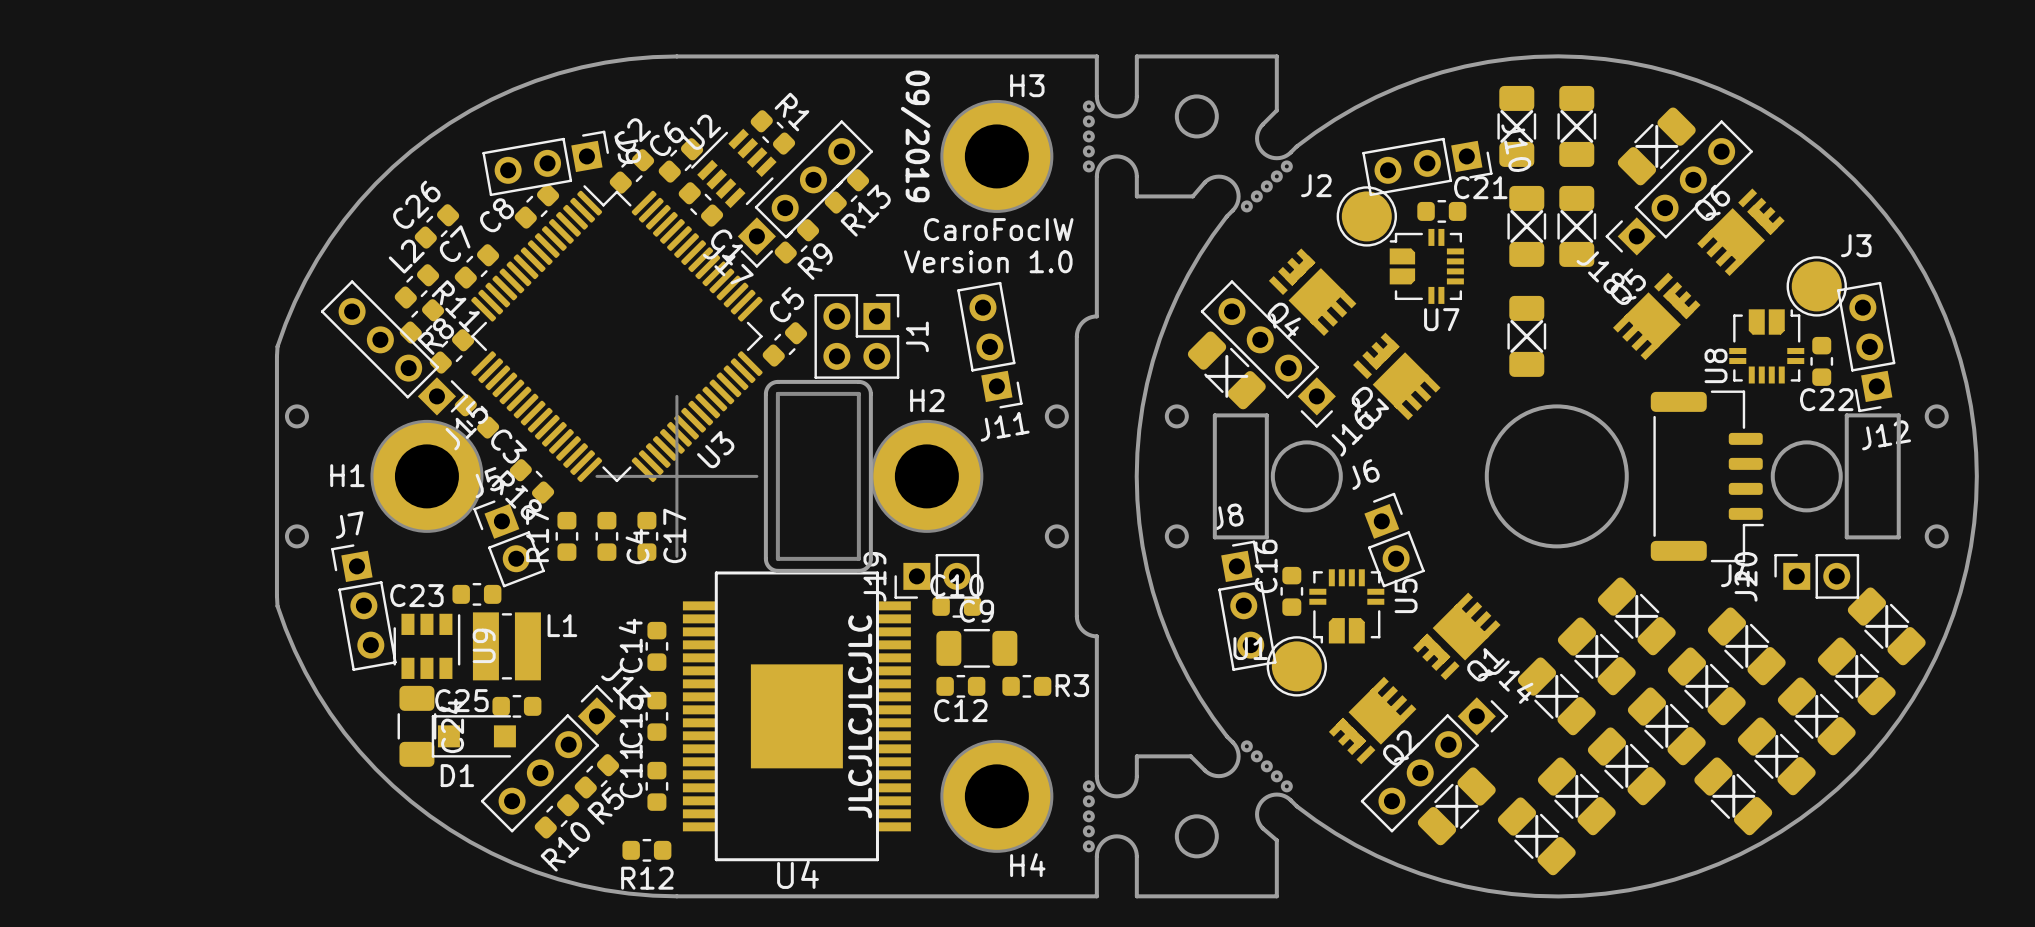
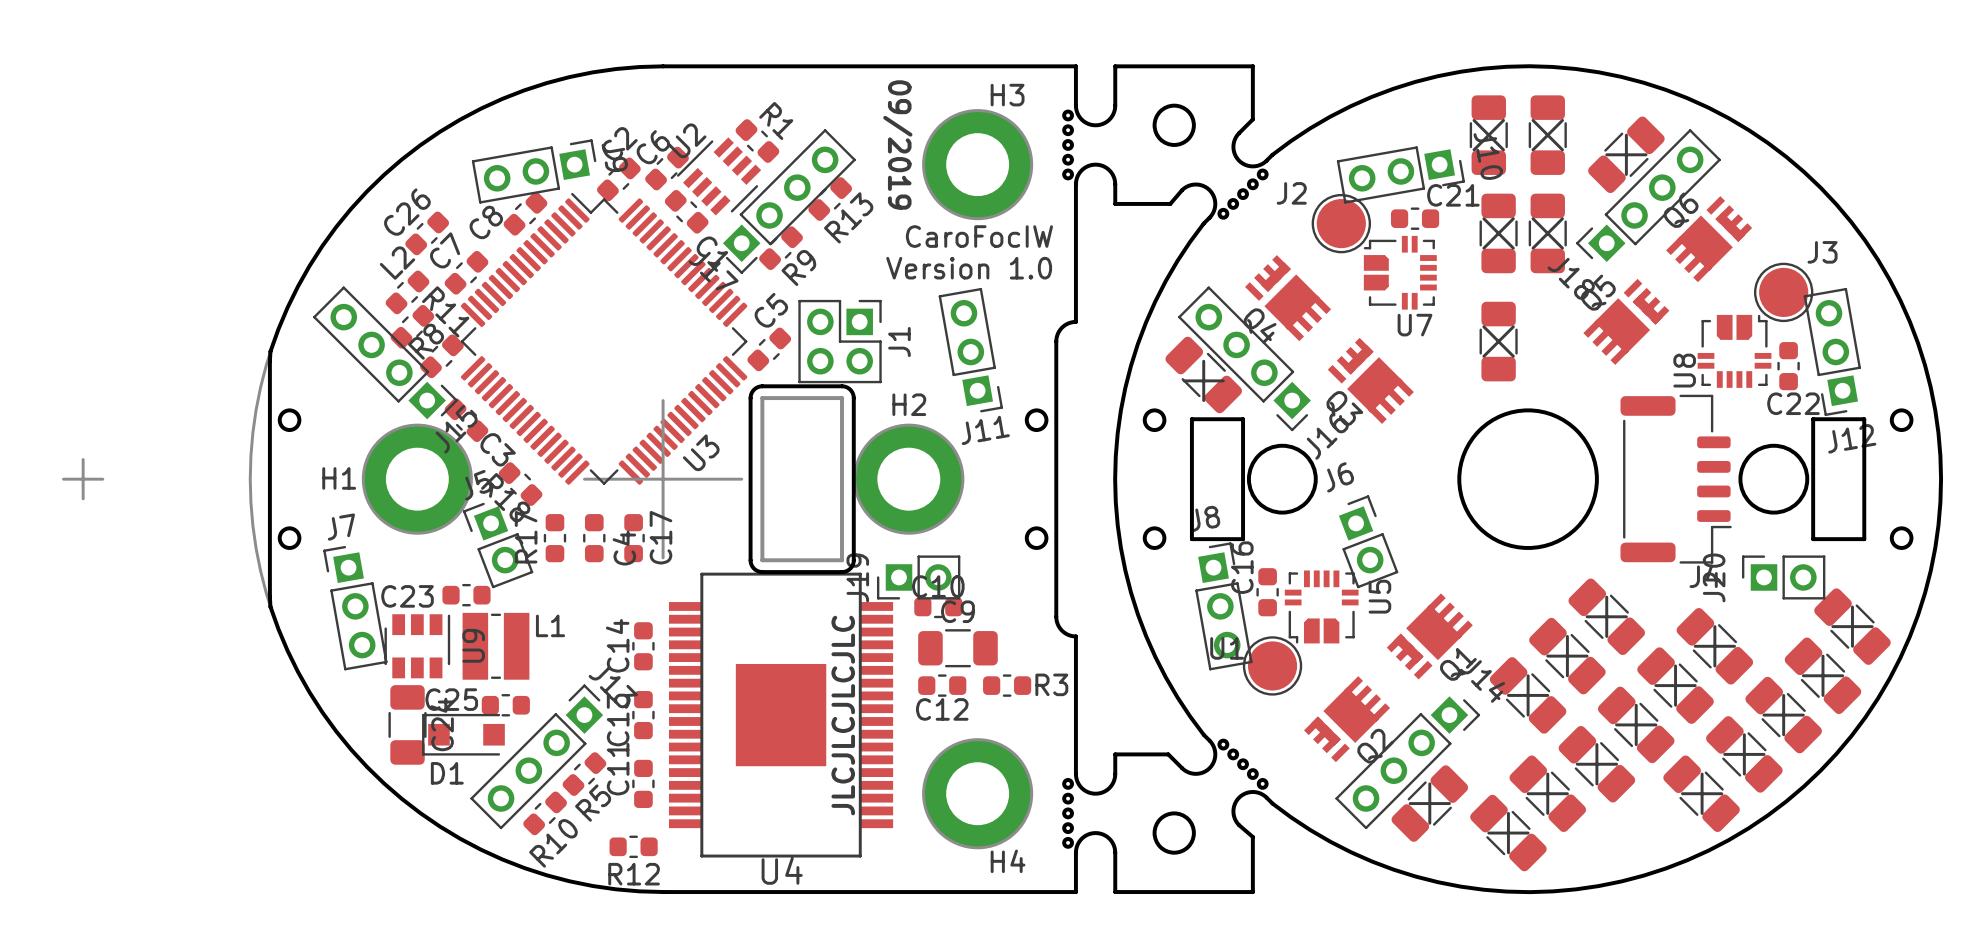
line: none -> (273, 342) (256, 409) (250, 479) (256, 548) (273, 615)
line: none -> (83, 459) (83, 498)
line: none -> (63, 479) (102, 479)

